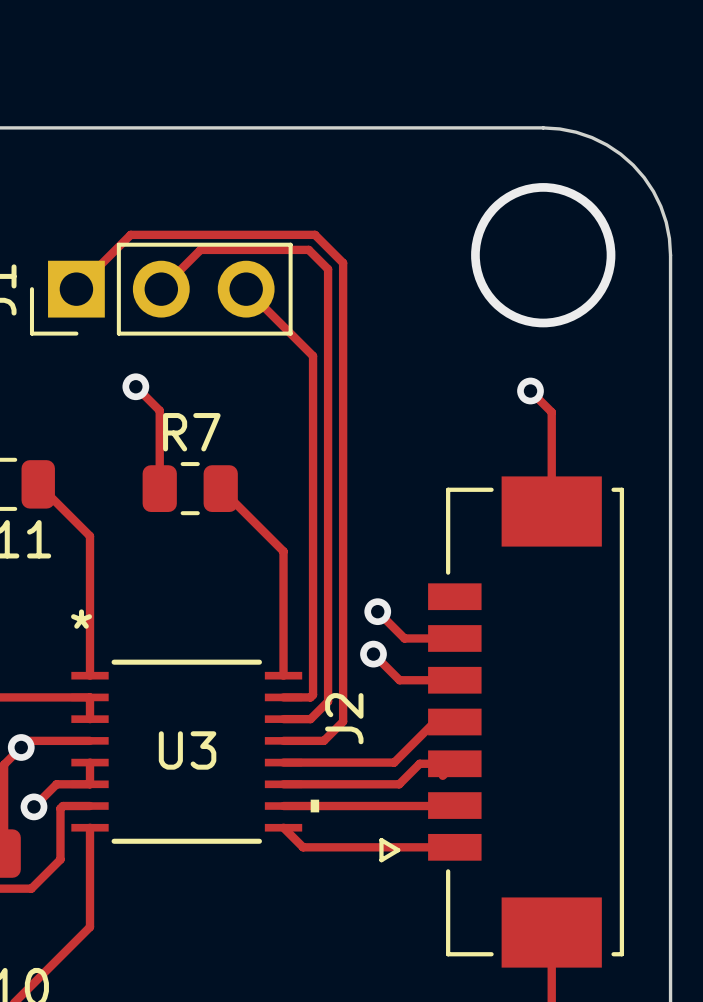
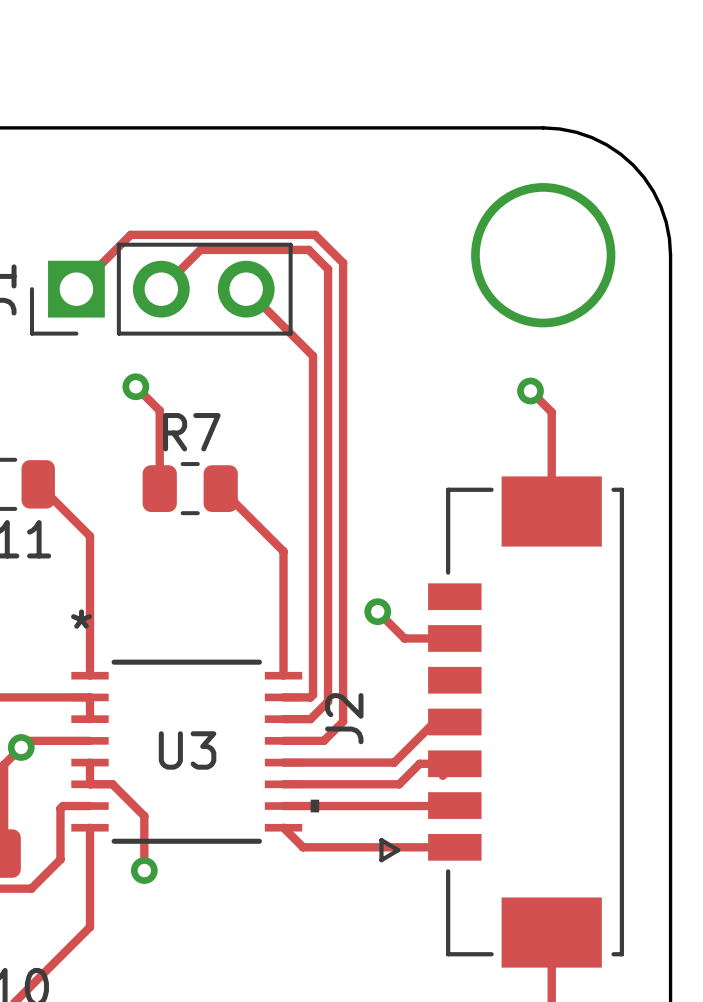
track: (373, 654) (399, 680) (454, 680) -> none
via: (373, 654) -> none
track: (90, 784) (56, 784) (33, 806) -> (90, 784) (112, 784) (144, 816) (144, 870)
via position: (33, 806) -> (144, 870)

